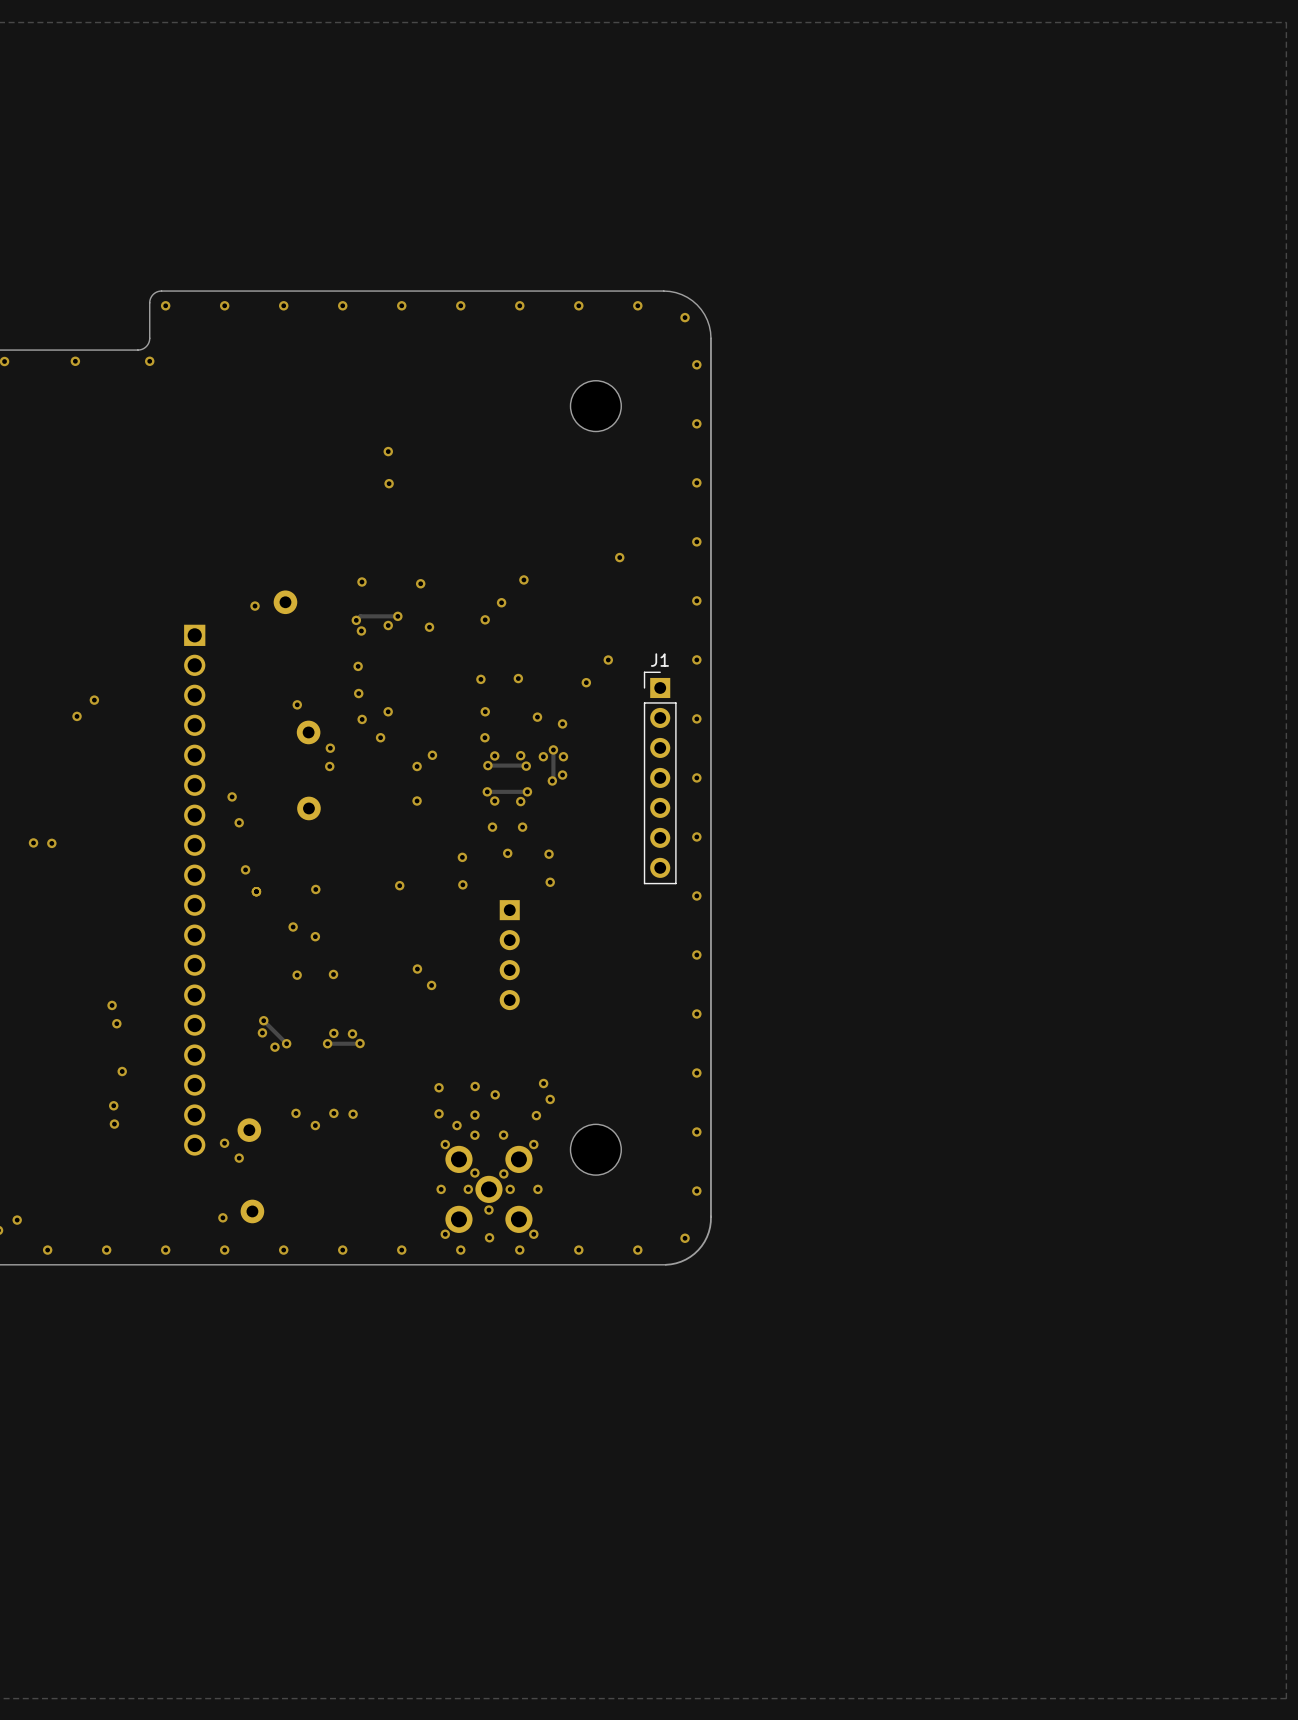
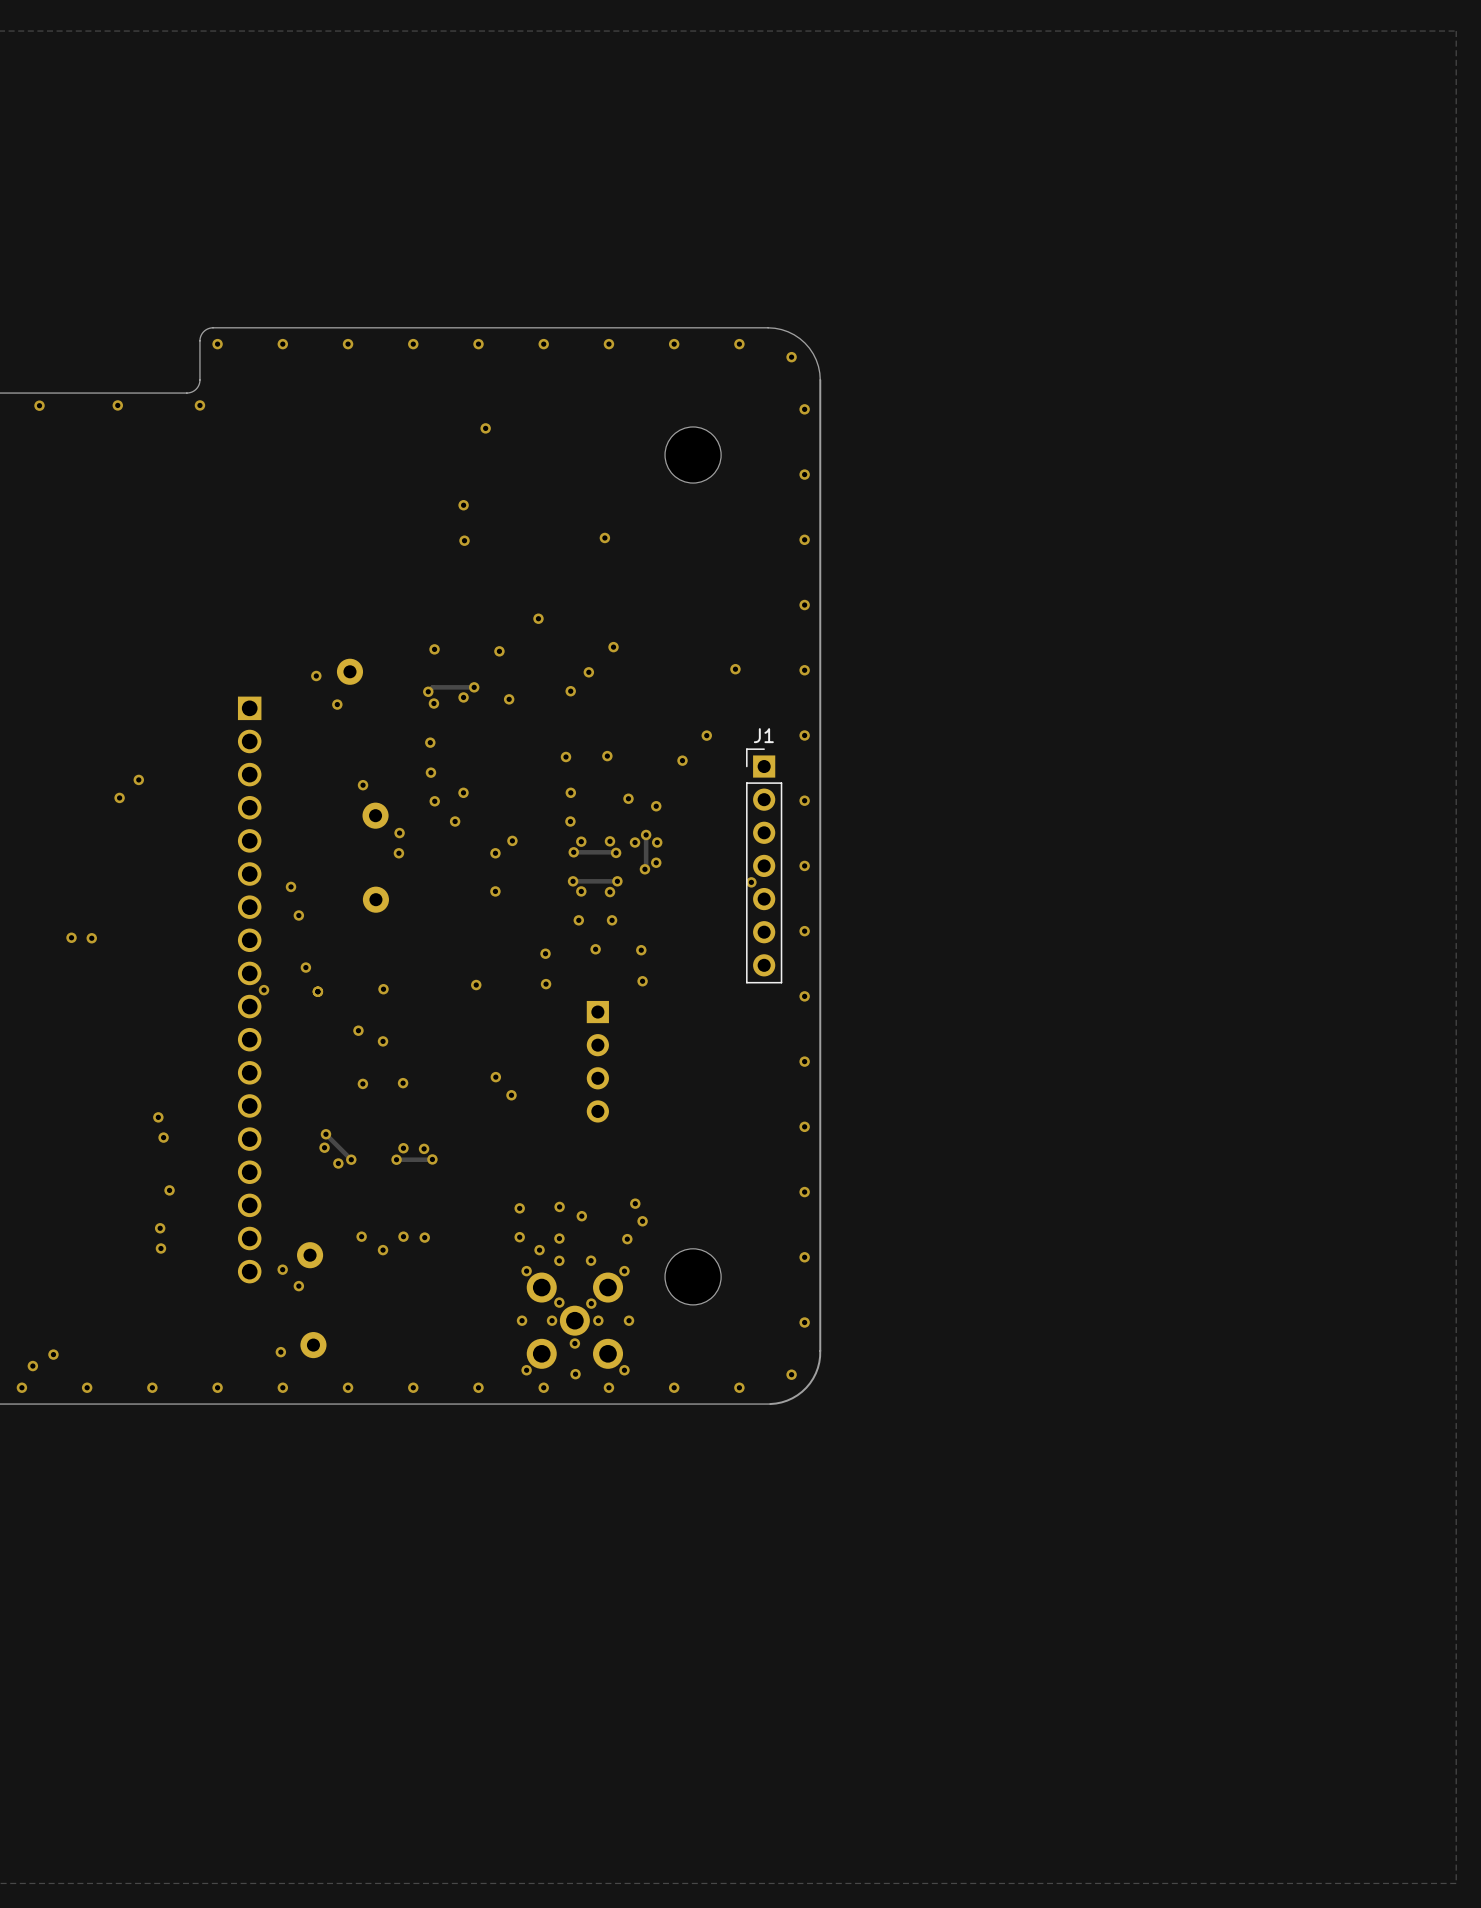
via: none -> (485, 428)
via: none -> (604, 537)
via: none -> (538, 618)
via position: (619, 557) -> (735, 669)
via: none -> (337, 704)
via: none -> (751, 882)
via: none -> (264, 990)

